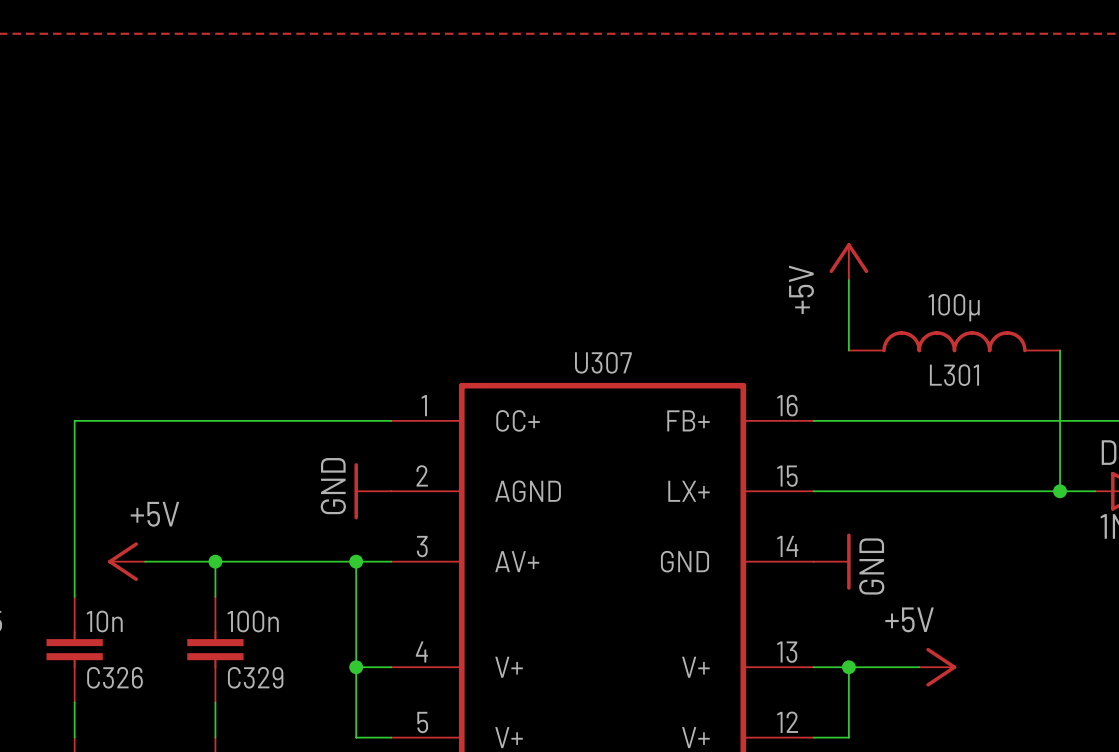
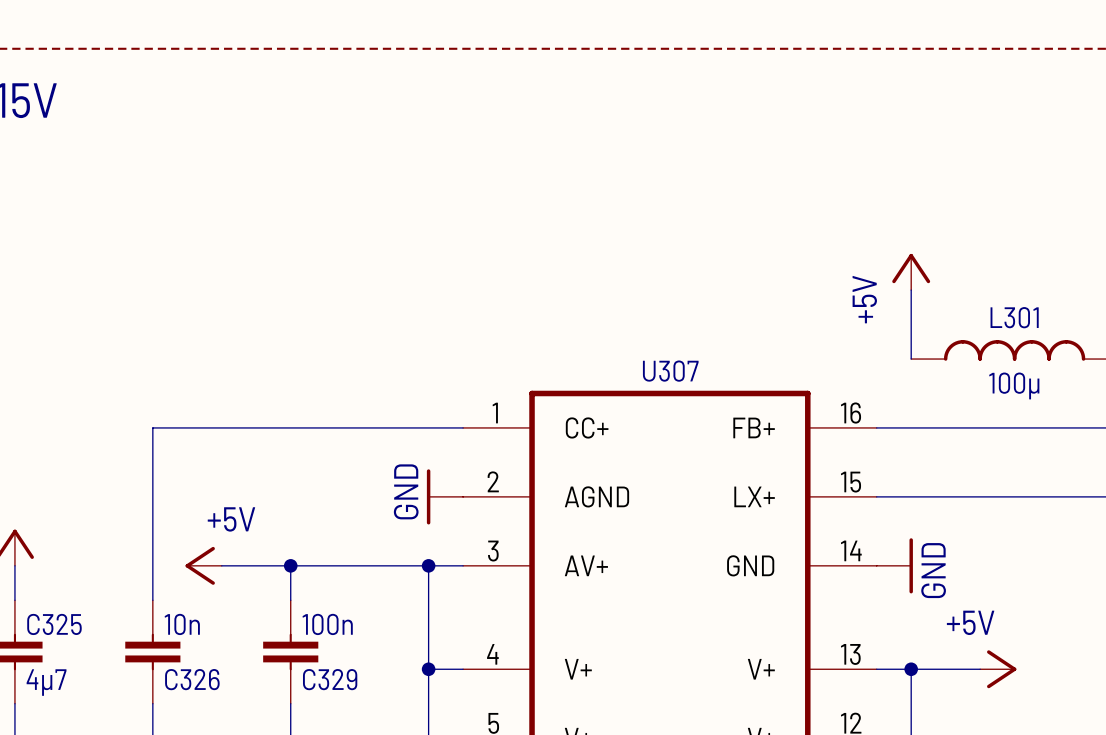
L301 value position: 100µ (954, 307) -> 100µ (1014, 385)
L301 name position: L301 (954, 375) -> L301 (1014, 317)

